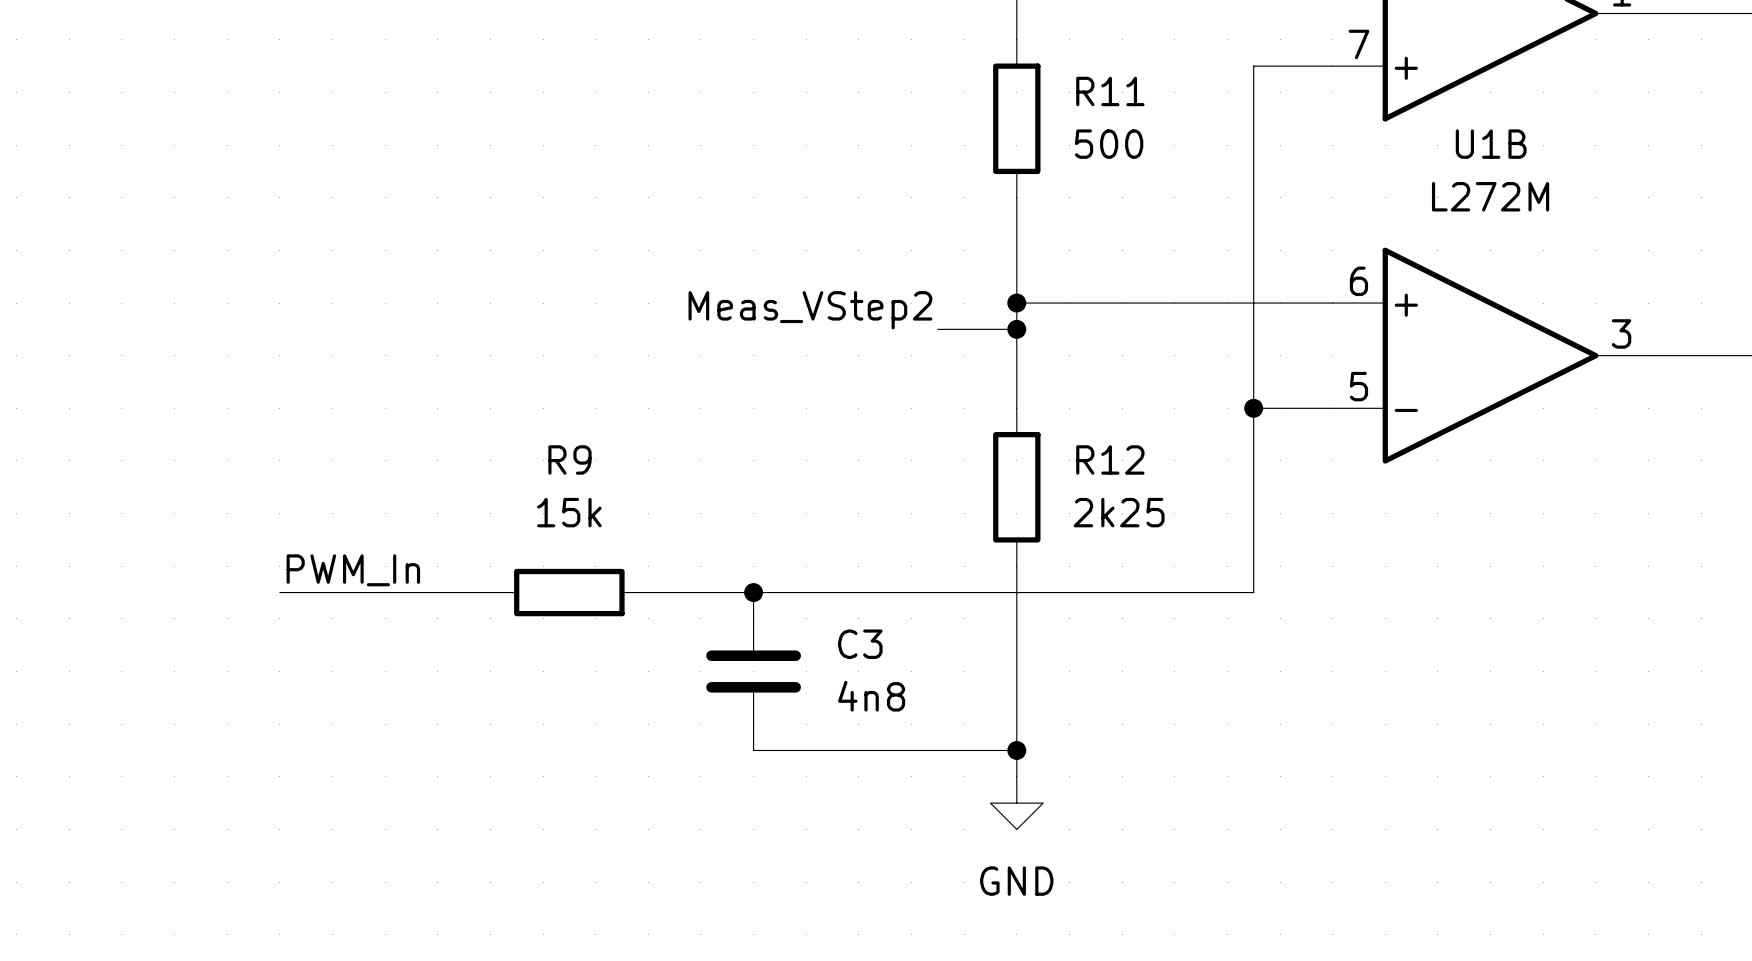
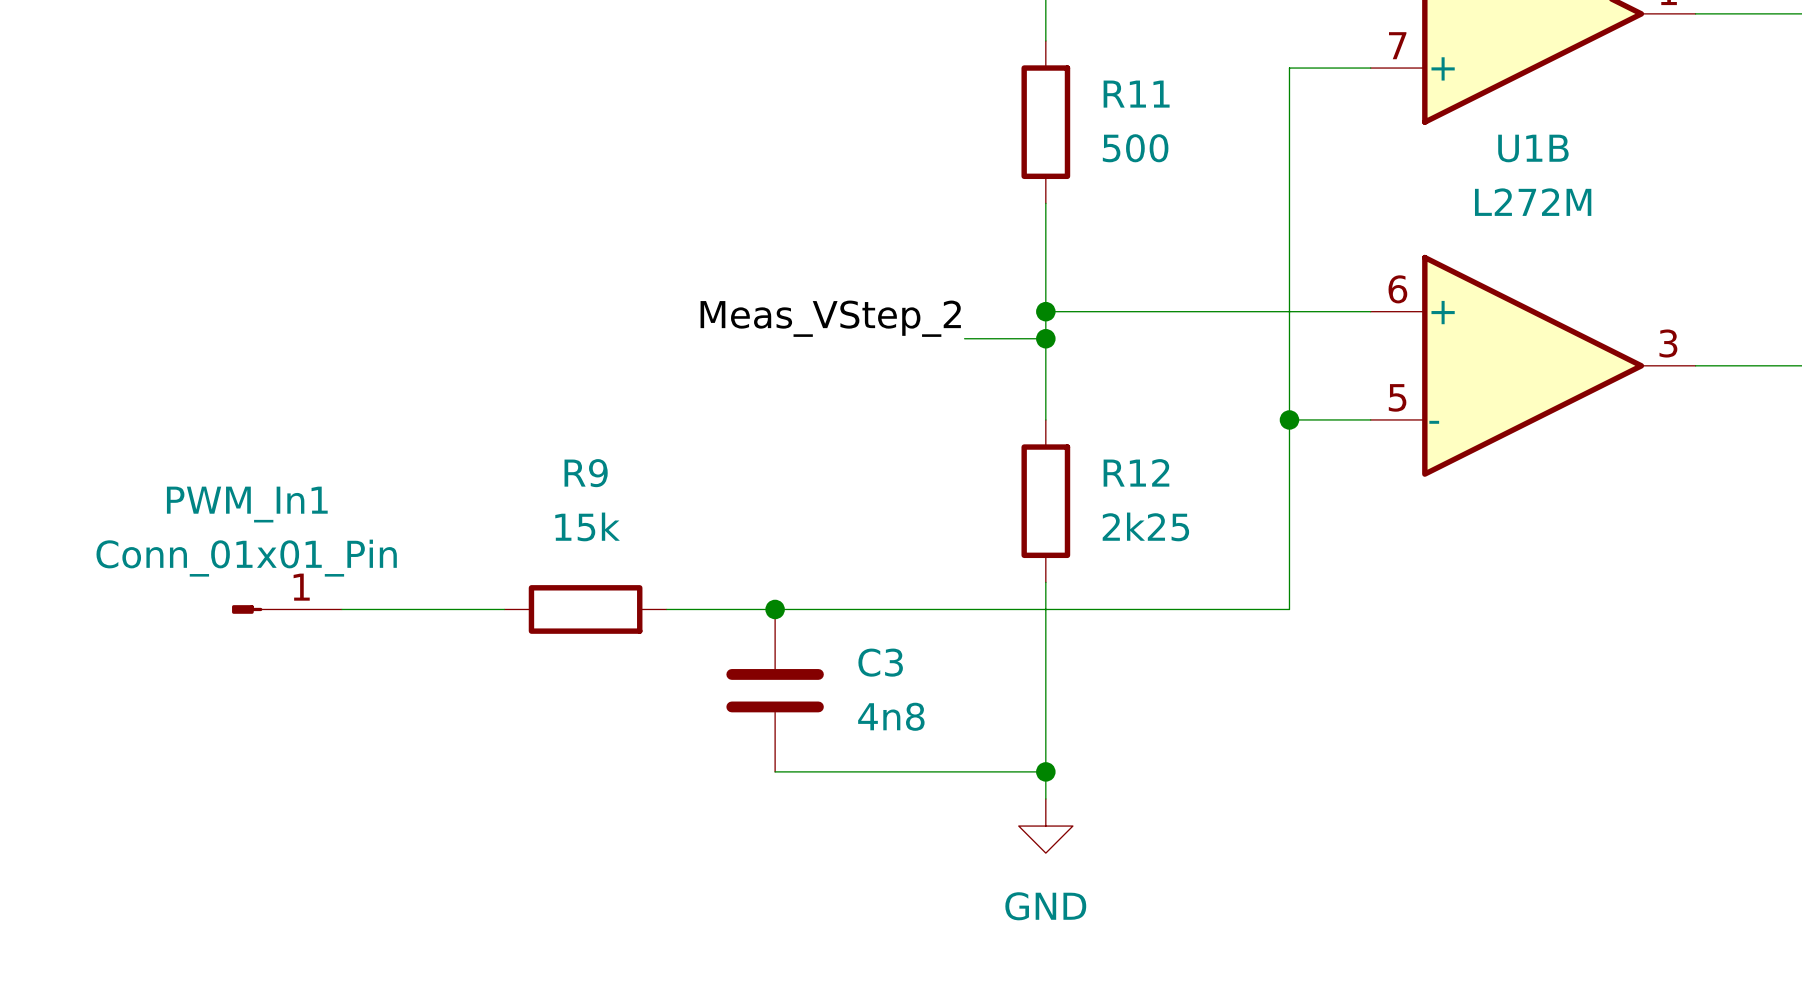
label: Meas_VStep2 (810, 310) -> Meas_VStep_2 (830, 318)
label: PWM_In (353, 570) -> none
PWM_In1: none -> Conn_01x01_Pin (286, 609)

